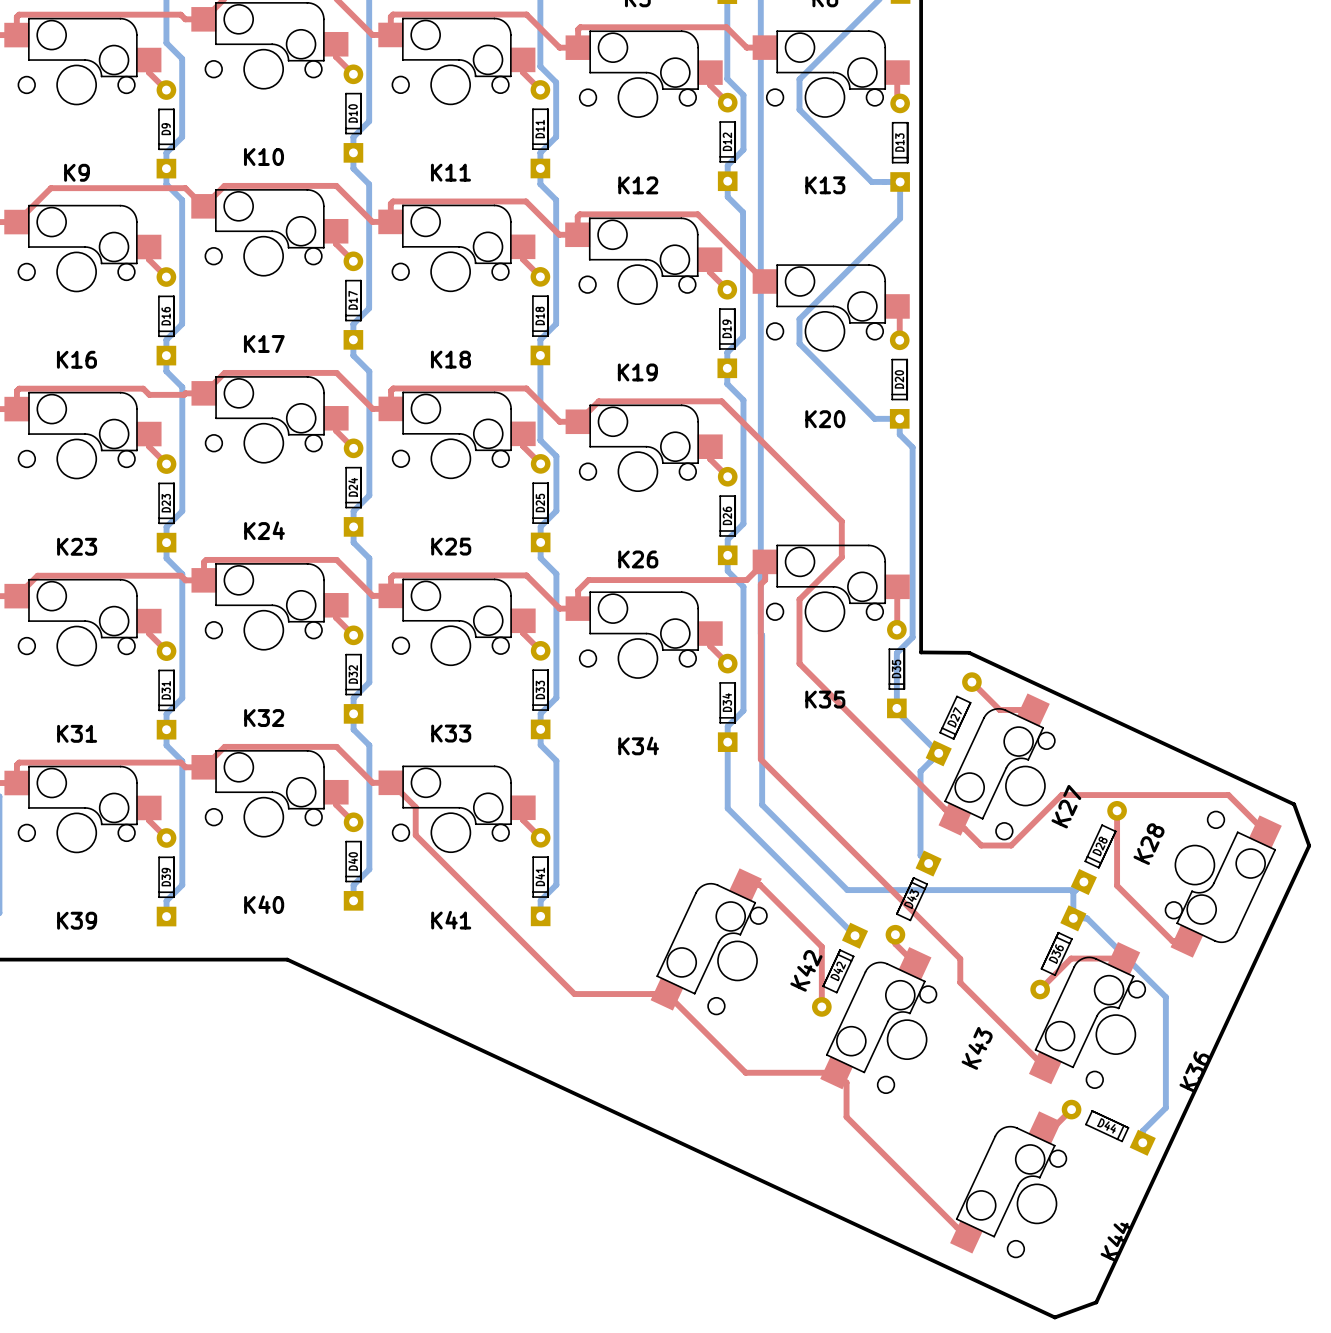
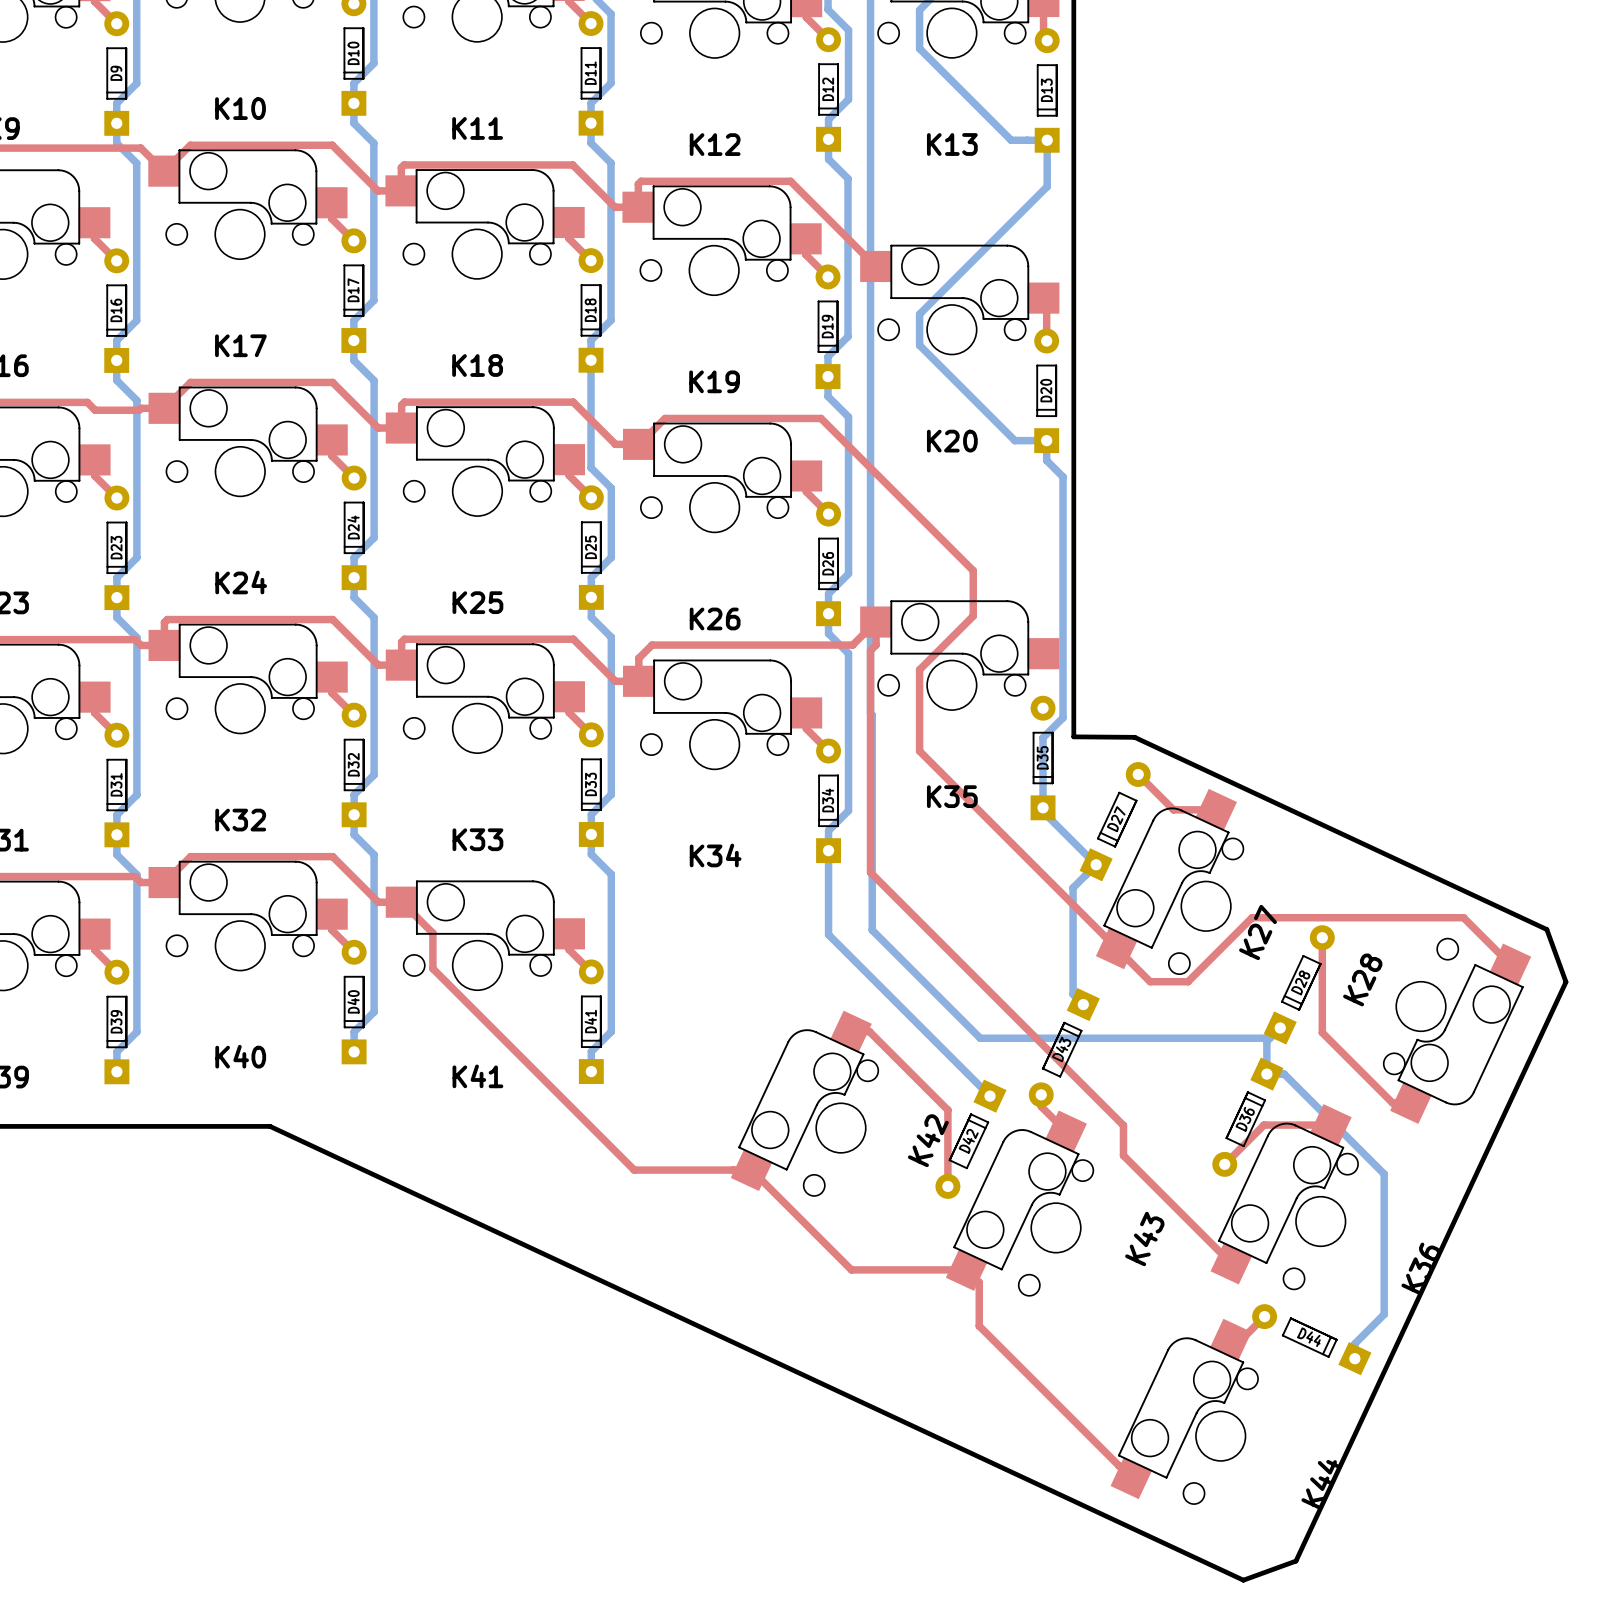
top track: (897, 586) (896, 629) -> none

